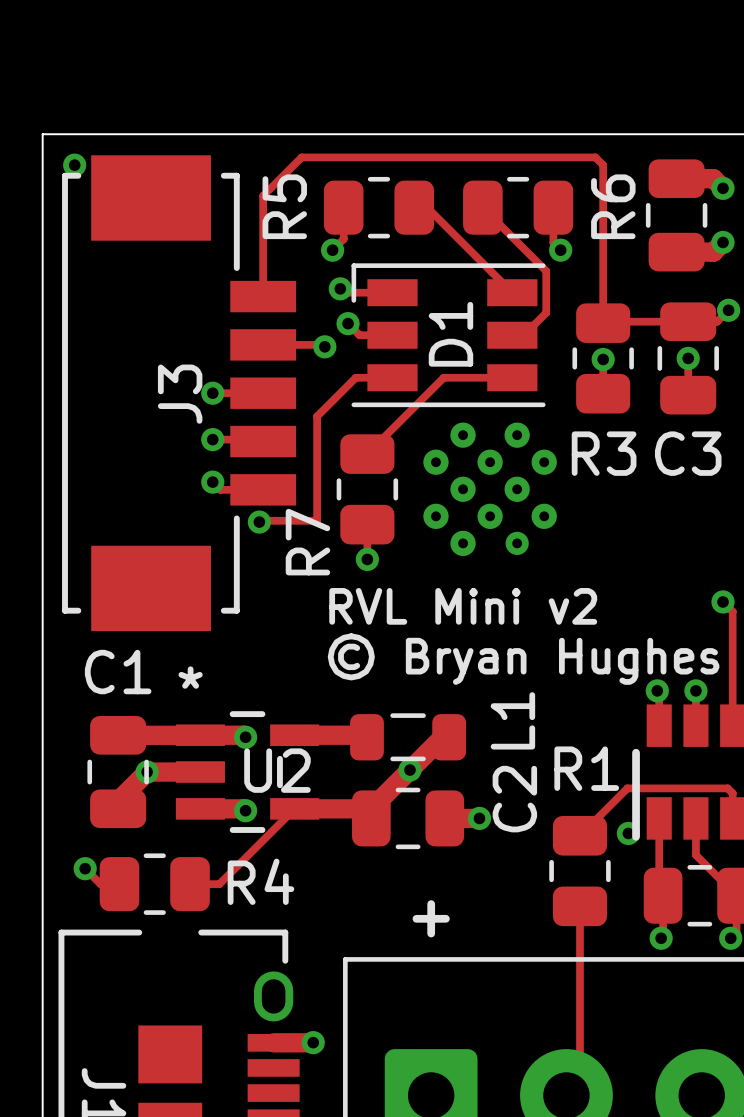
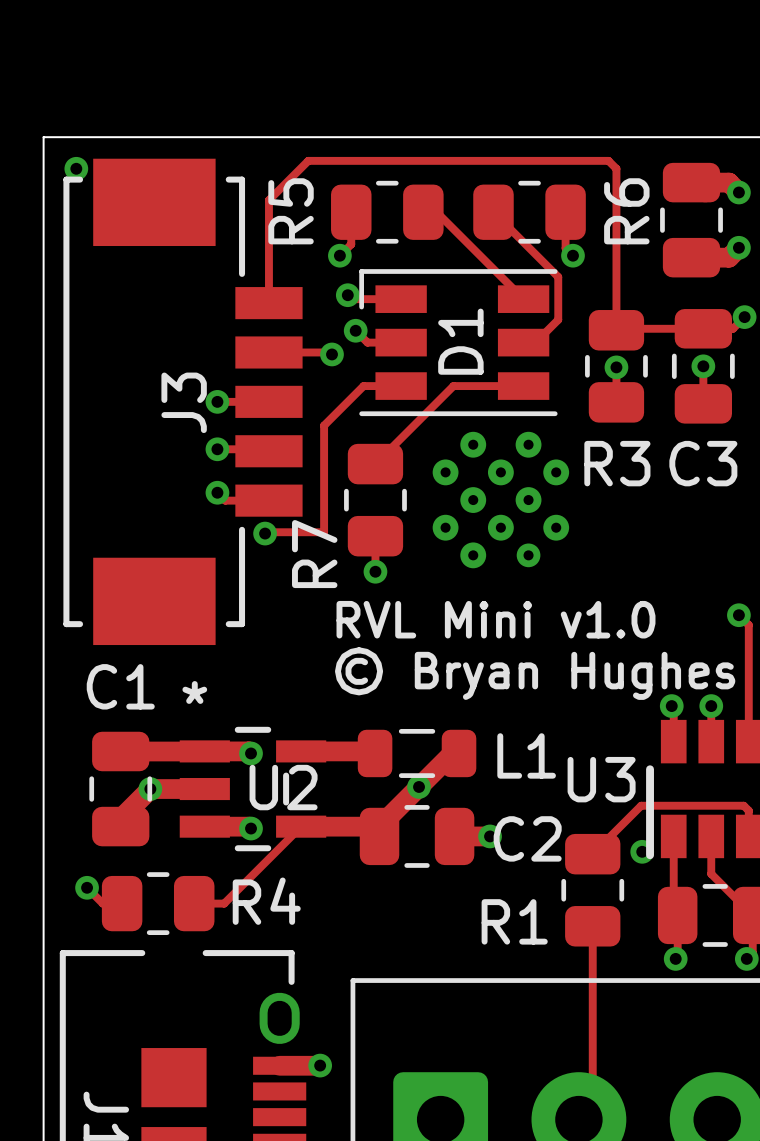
text: RVL Mini v2 (463, 606) -> RVL Mini v1.0 (495, 619)
L1 name rotation: 0° (512, 720) -> 90° clockwise (526, 755)
U3 name: none -> U3 (601, 779)
R1 name position: R1 (586, 768) -> R1 (514, 921)
C2 name rotation: 0° (514, 799) -> 90° clockwise (527, 838)
text: + (431, 918) -> none

